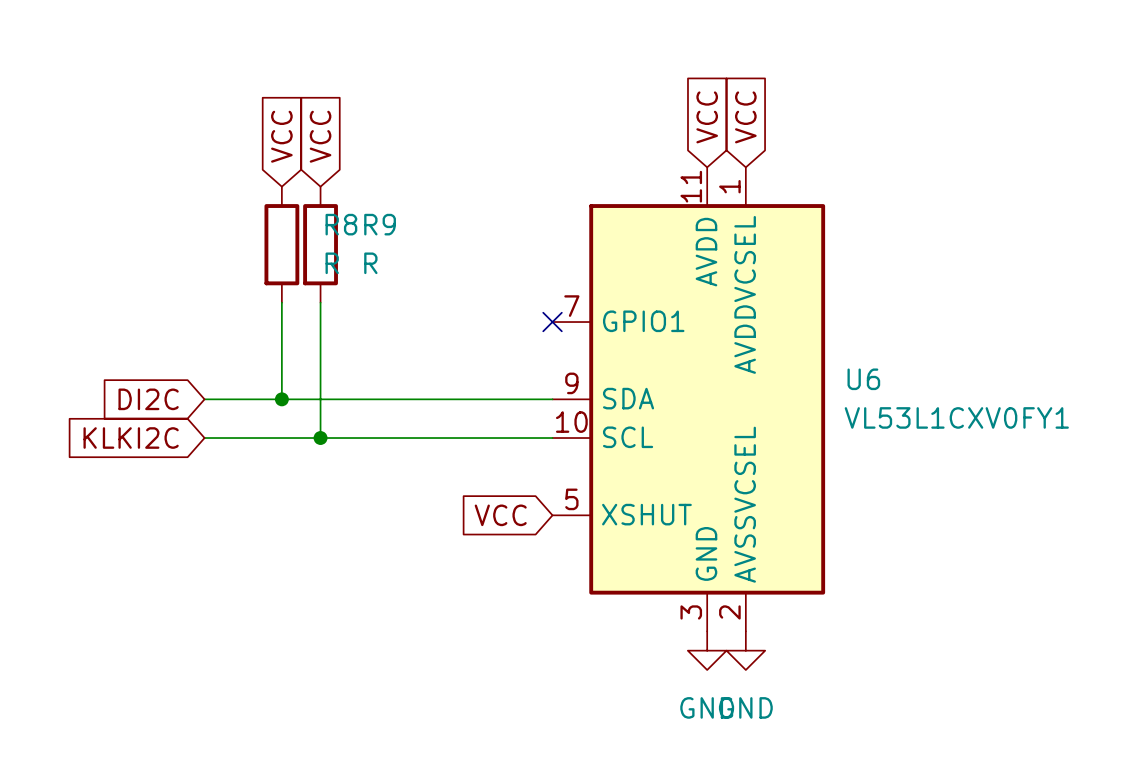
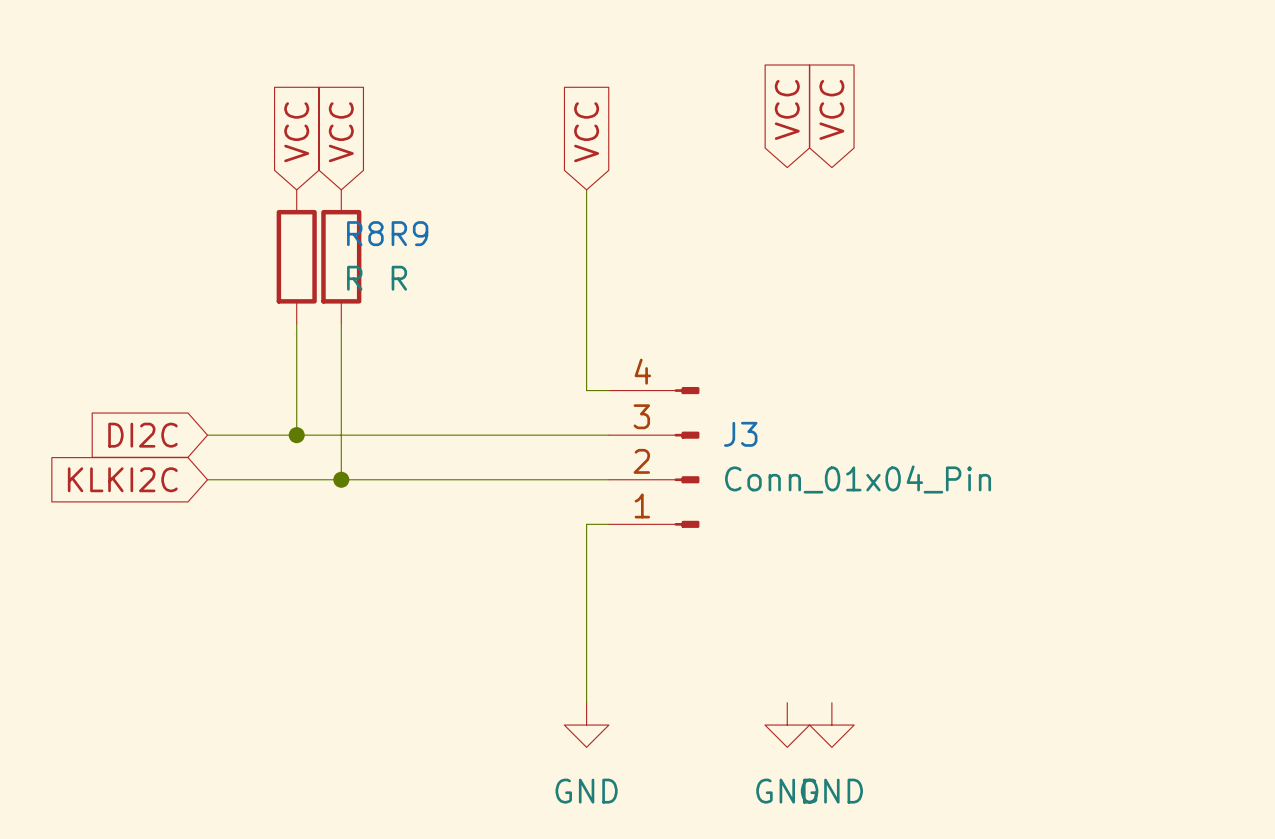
wire: none -> (586, 189) (586, 390) (608, 390)
no-connect mark: (552, 322) -> none
U6: VL53L1CXV0FY1 (688, 399) -> none
J3: none -> Conn_01x04_Pin (654, 457)
wire: none -> (608, 524) (586, 524) (586, 702)
global label rotation: 0° (500, 515) -> 90° clockwise (586, 132)
global label position: VCC (500, 515) -> VCC (586, 132)
power symbol: none -> GND (586, 725)

